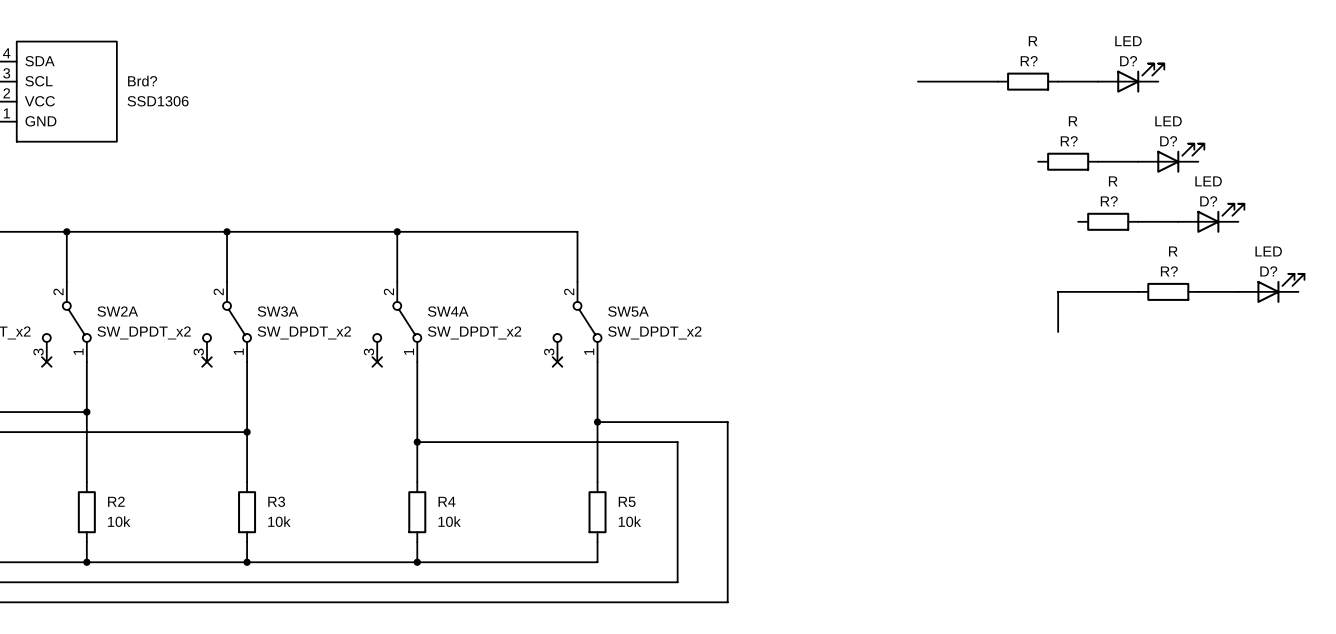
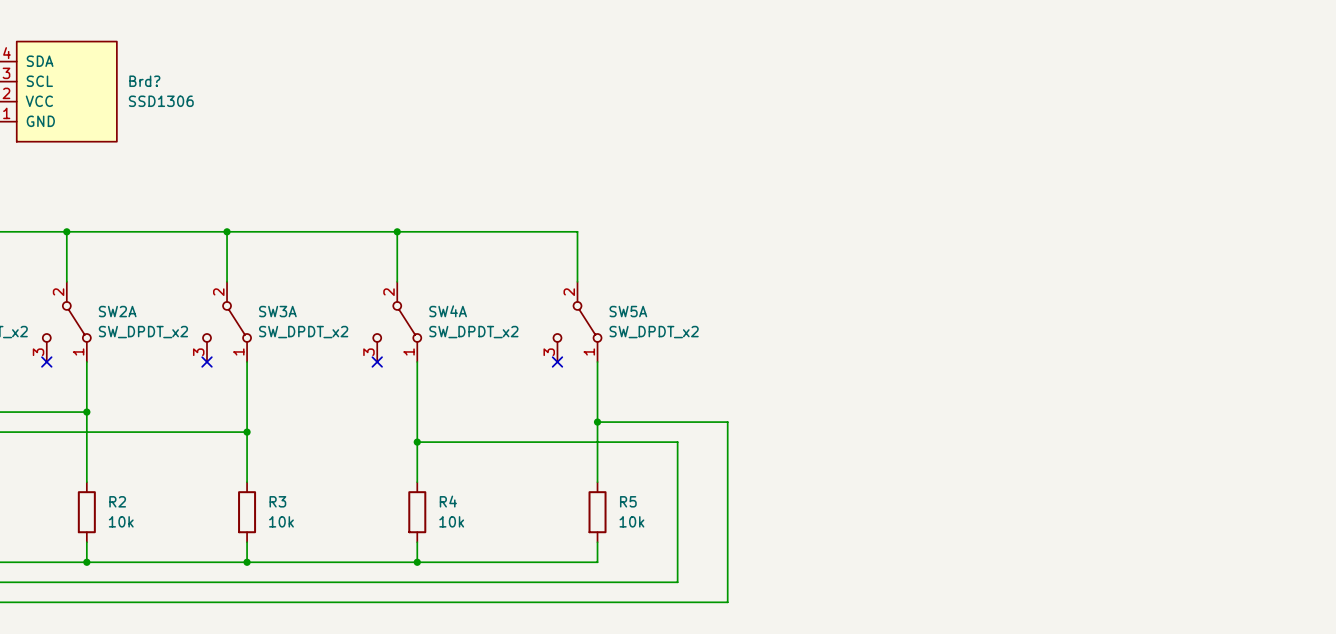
D?: LED (1131, 78) -> none
wire: (917, 81) (998, 81) -> none
R?: R (1028, 81) -> none
wire: (1058, 81) (1098, 81) -> none
D?: LED (1171, 158) -> none
R?: R (1068, 161) -> none
wire: (1098, 161) (1138, 161) -> none
D?: LED (1211, 218) -> none
R?: R (1108, 221) -> none
wire: (1138, 221) (1178, 221) -> none
D?: LED (1271, 288) -> none
wire: (1138, 291) (1058, 291) (1058, 331) -> none
R?: R (1168, 291) -> none
wire: (1198, 291) (1238, 291) -> none

